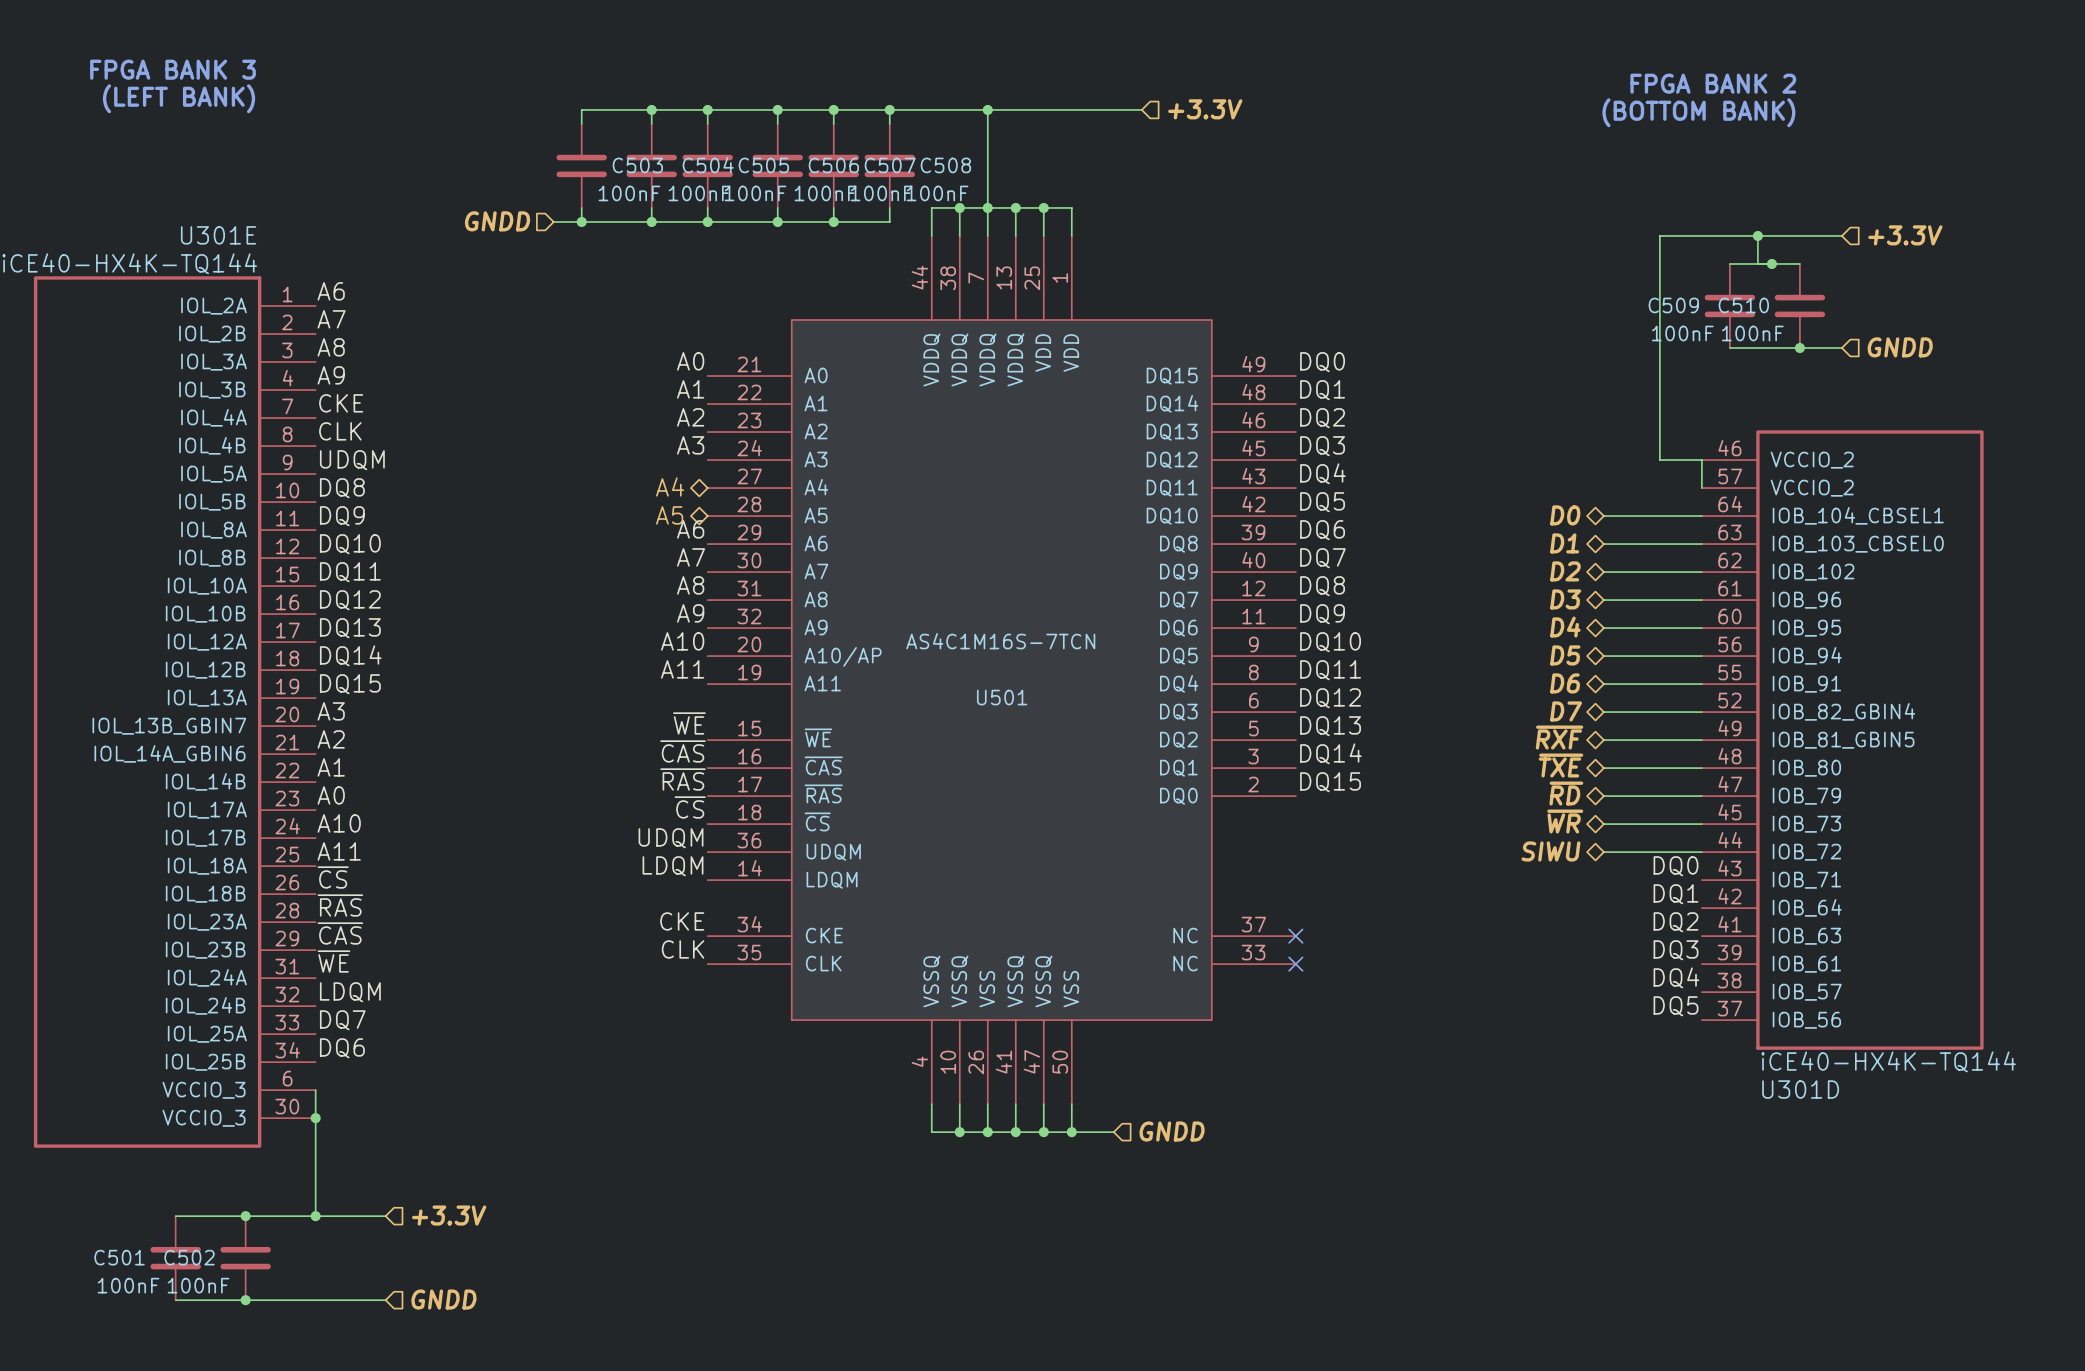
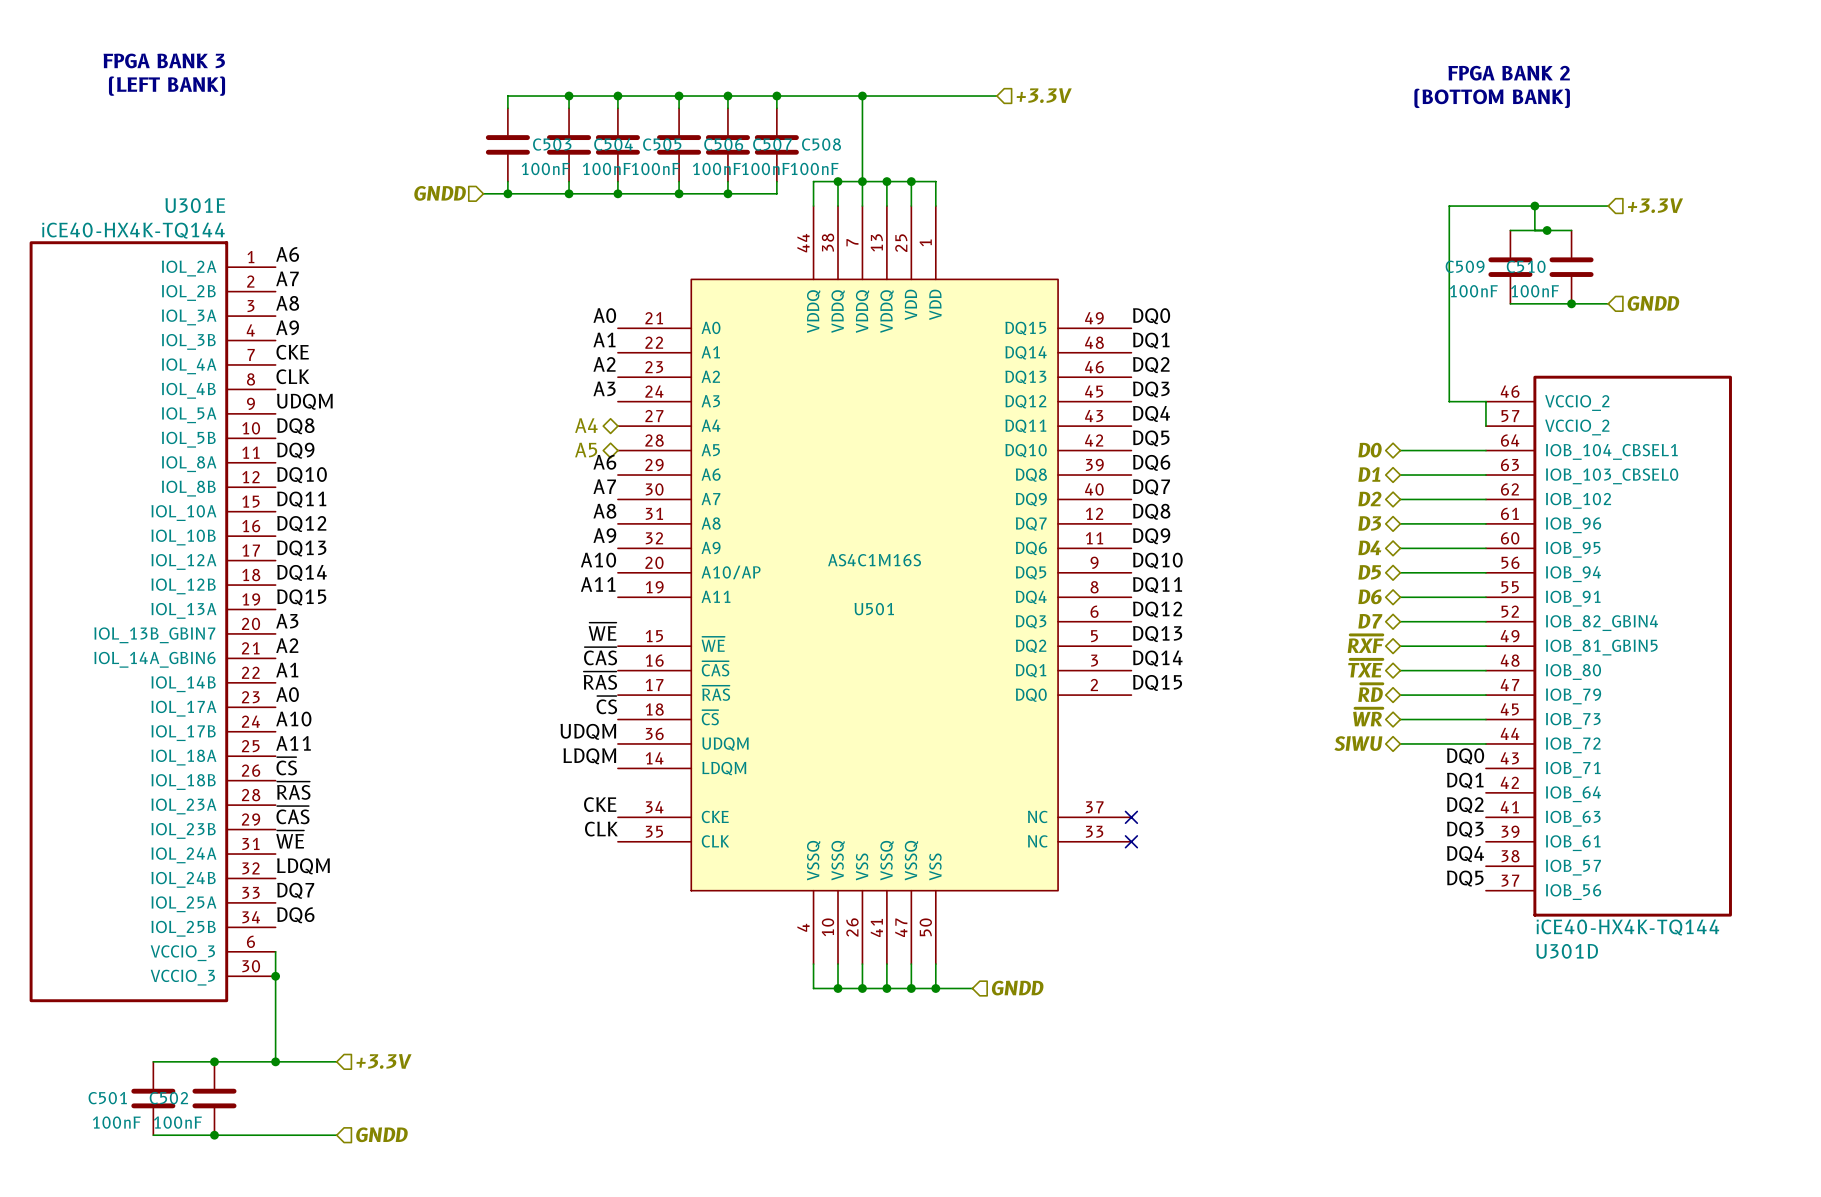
U501 value: AS4C1M16S-7TCN (1000, 641) -> AS4C1M16S (874, 560)

